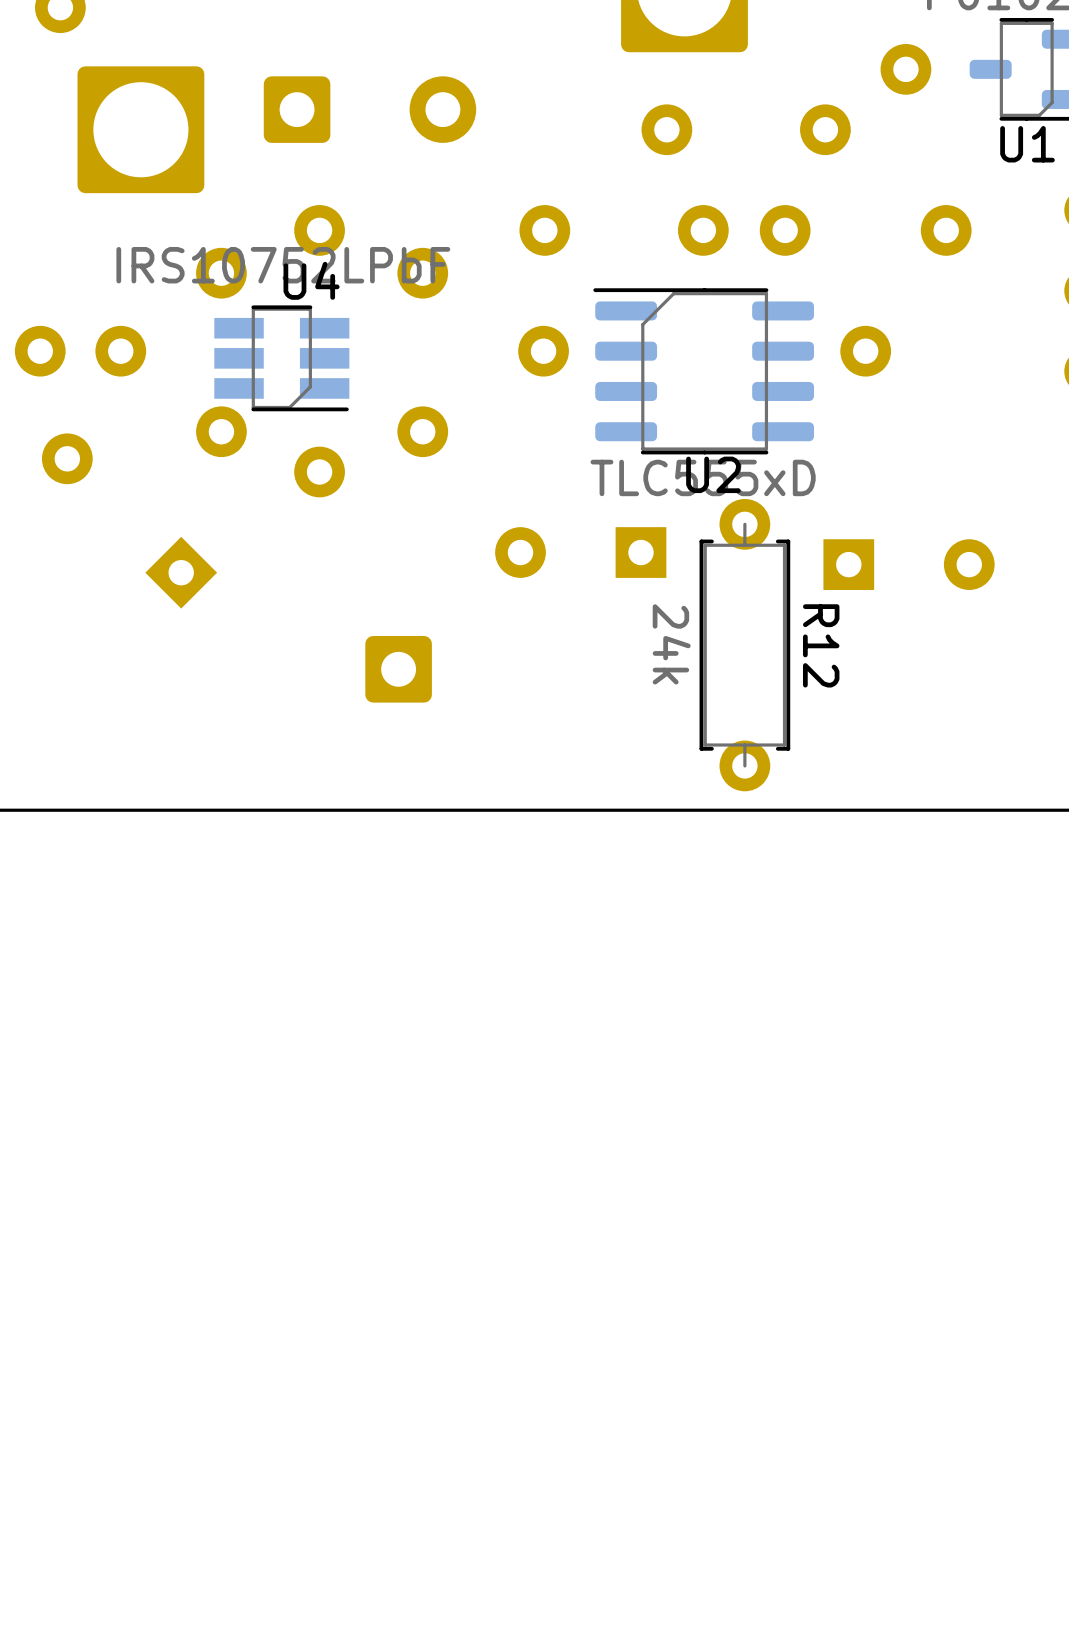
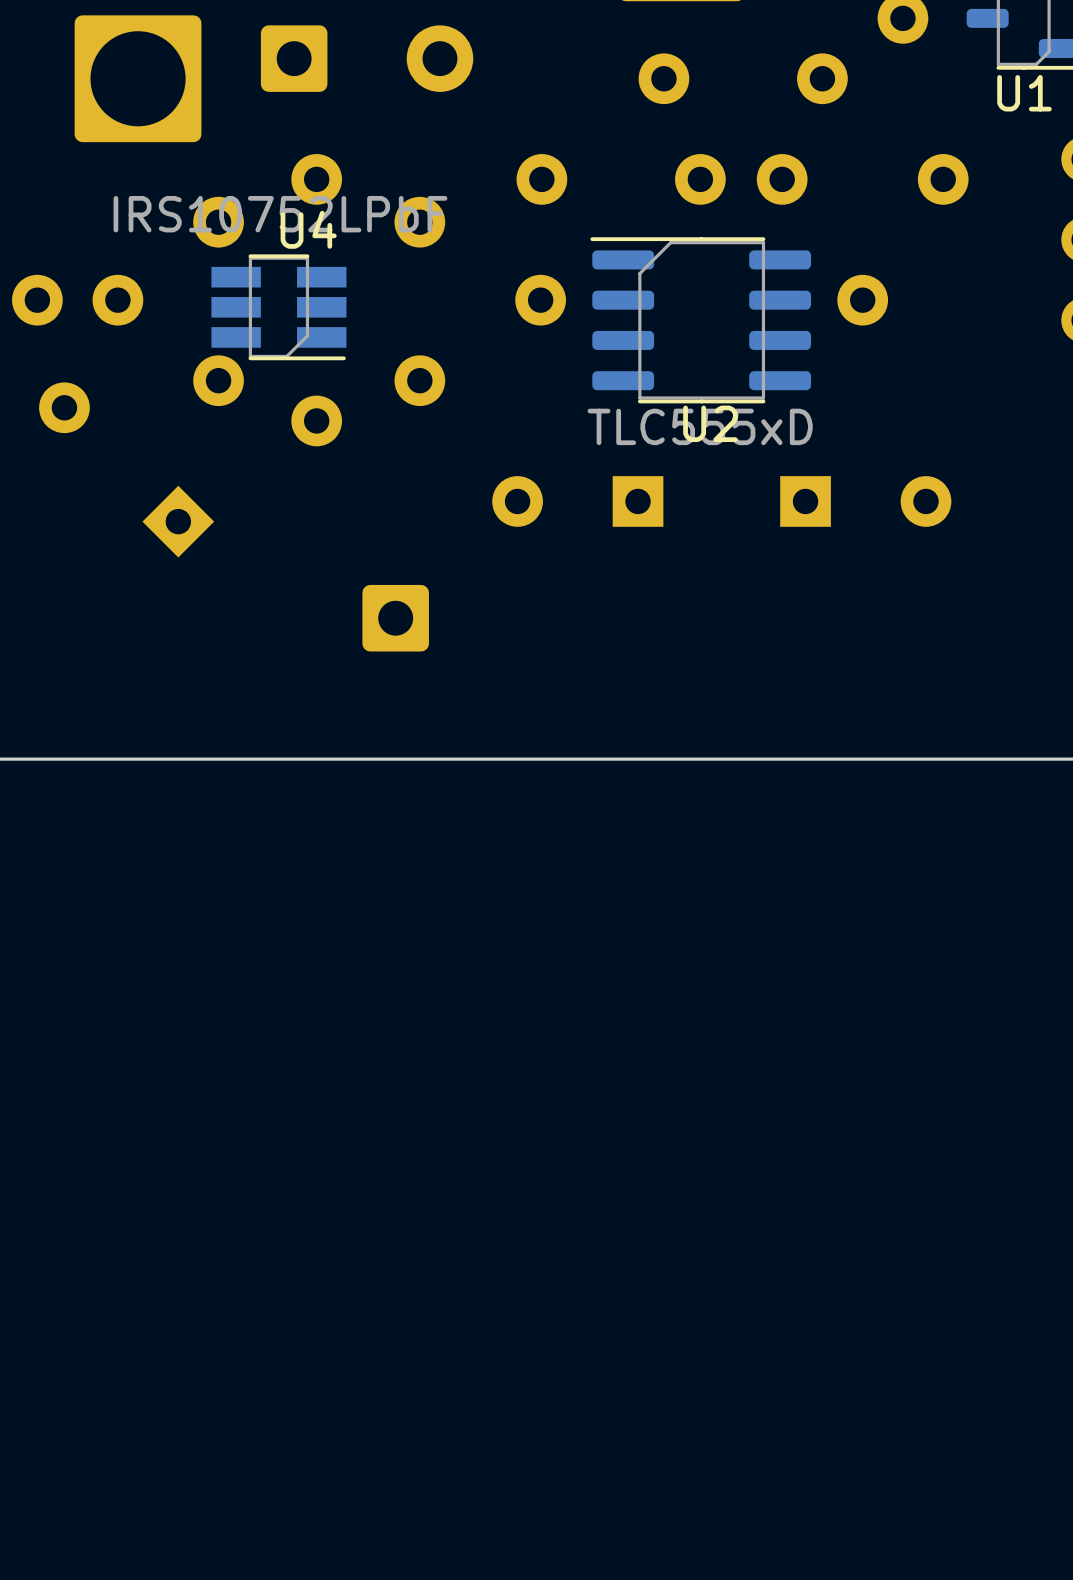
part position: (909, 564) -> (865, 501)
R12: 24k (744, 645) -> none

